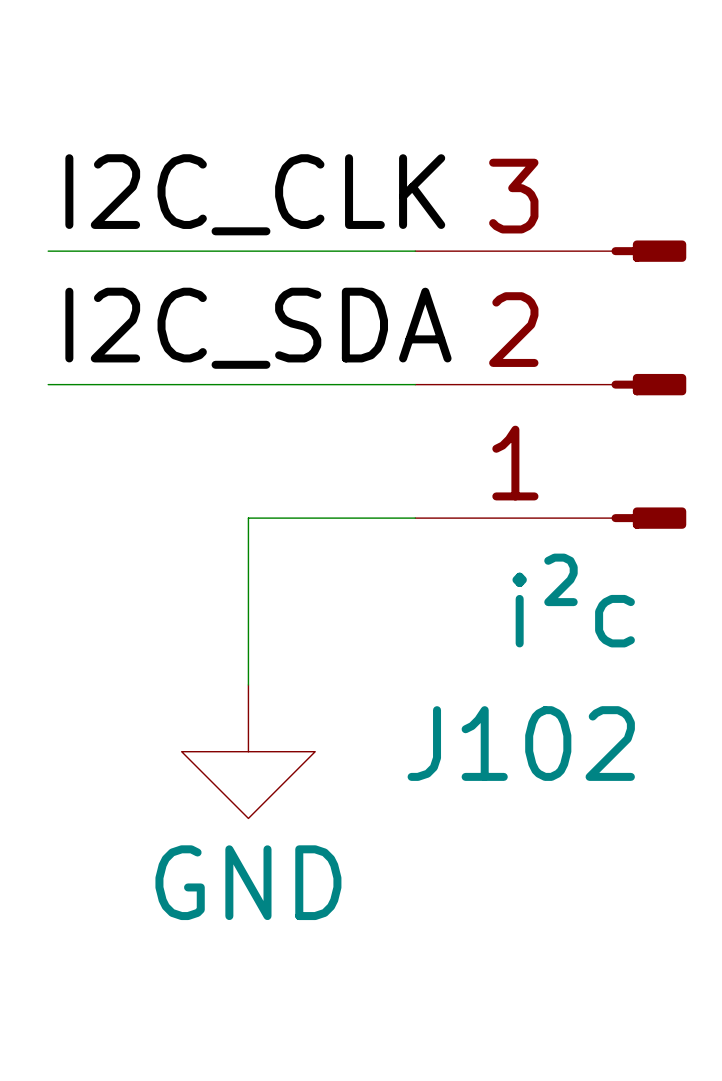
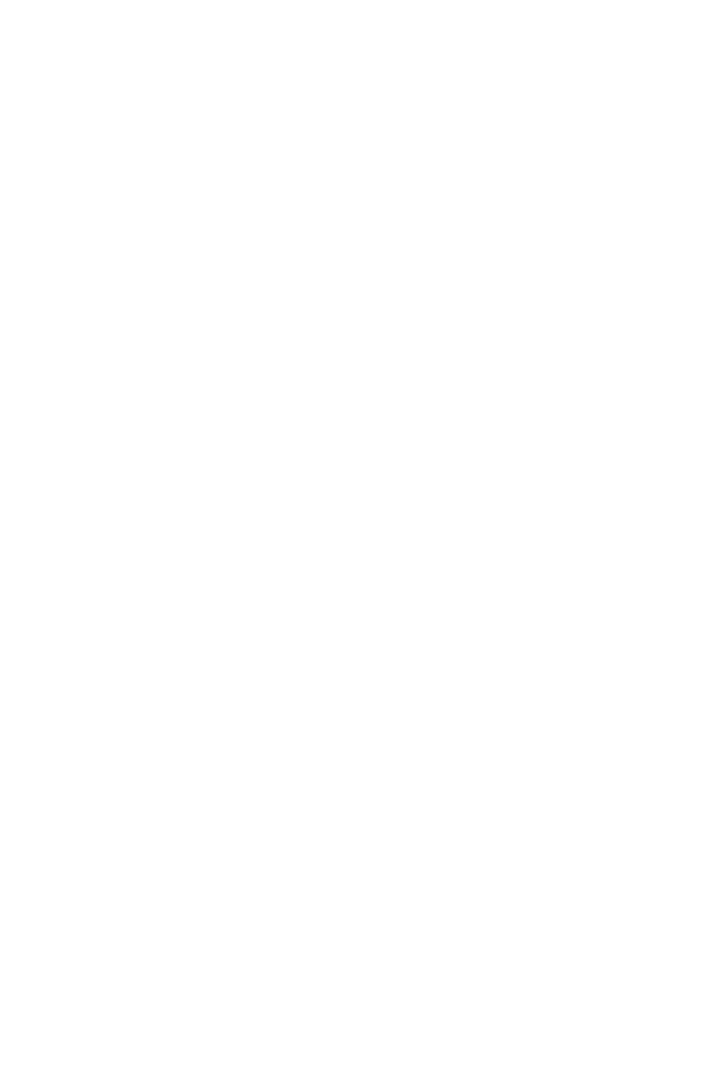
label: I2C_CLK (255, 194) -> none
wire: (48, 251) (415, 251) -> none
label: I2C_SDA (258, 328) -> none
wire: (48, 384) (415, 384) -> none
J102: i²c (550, 384) -> none
wire: (415, 518) (248, 518) (248, 684) -> none
power symbol: GND (248, 751) -> none

